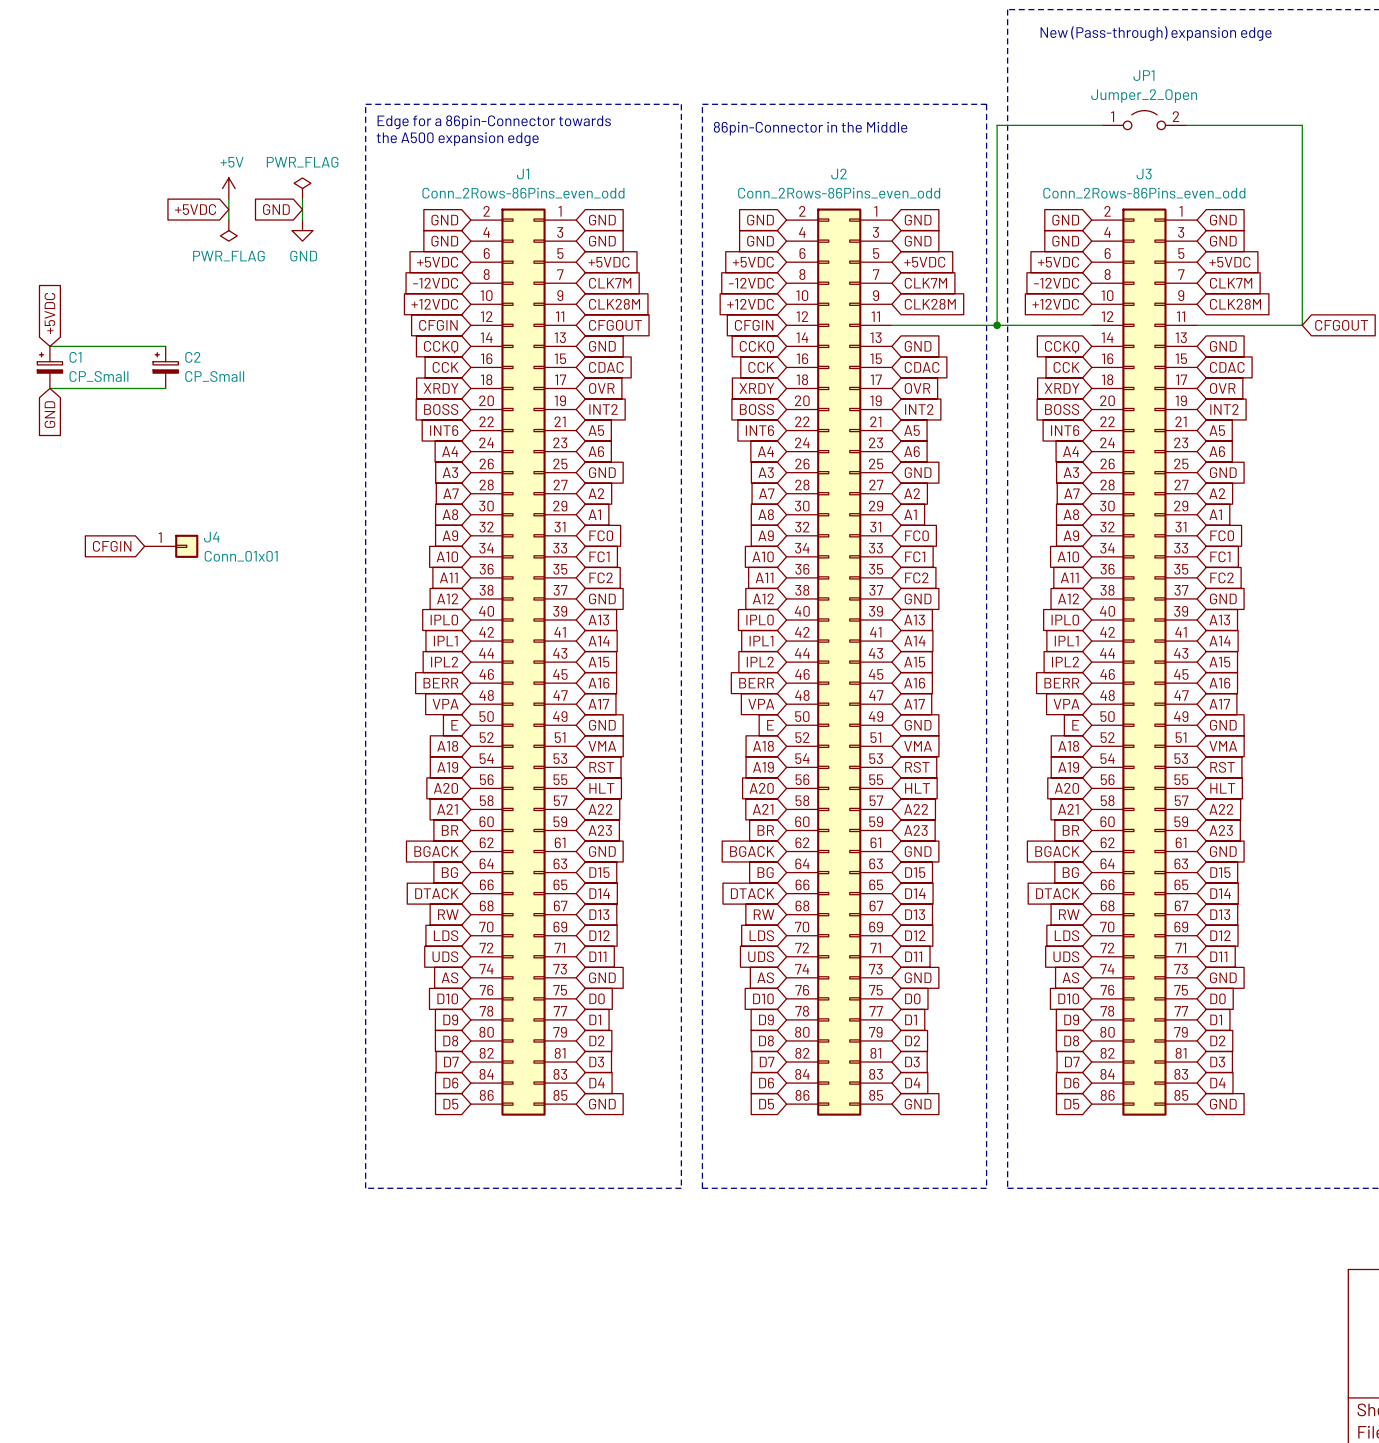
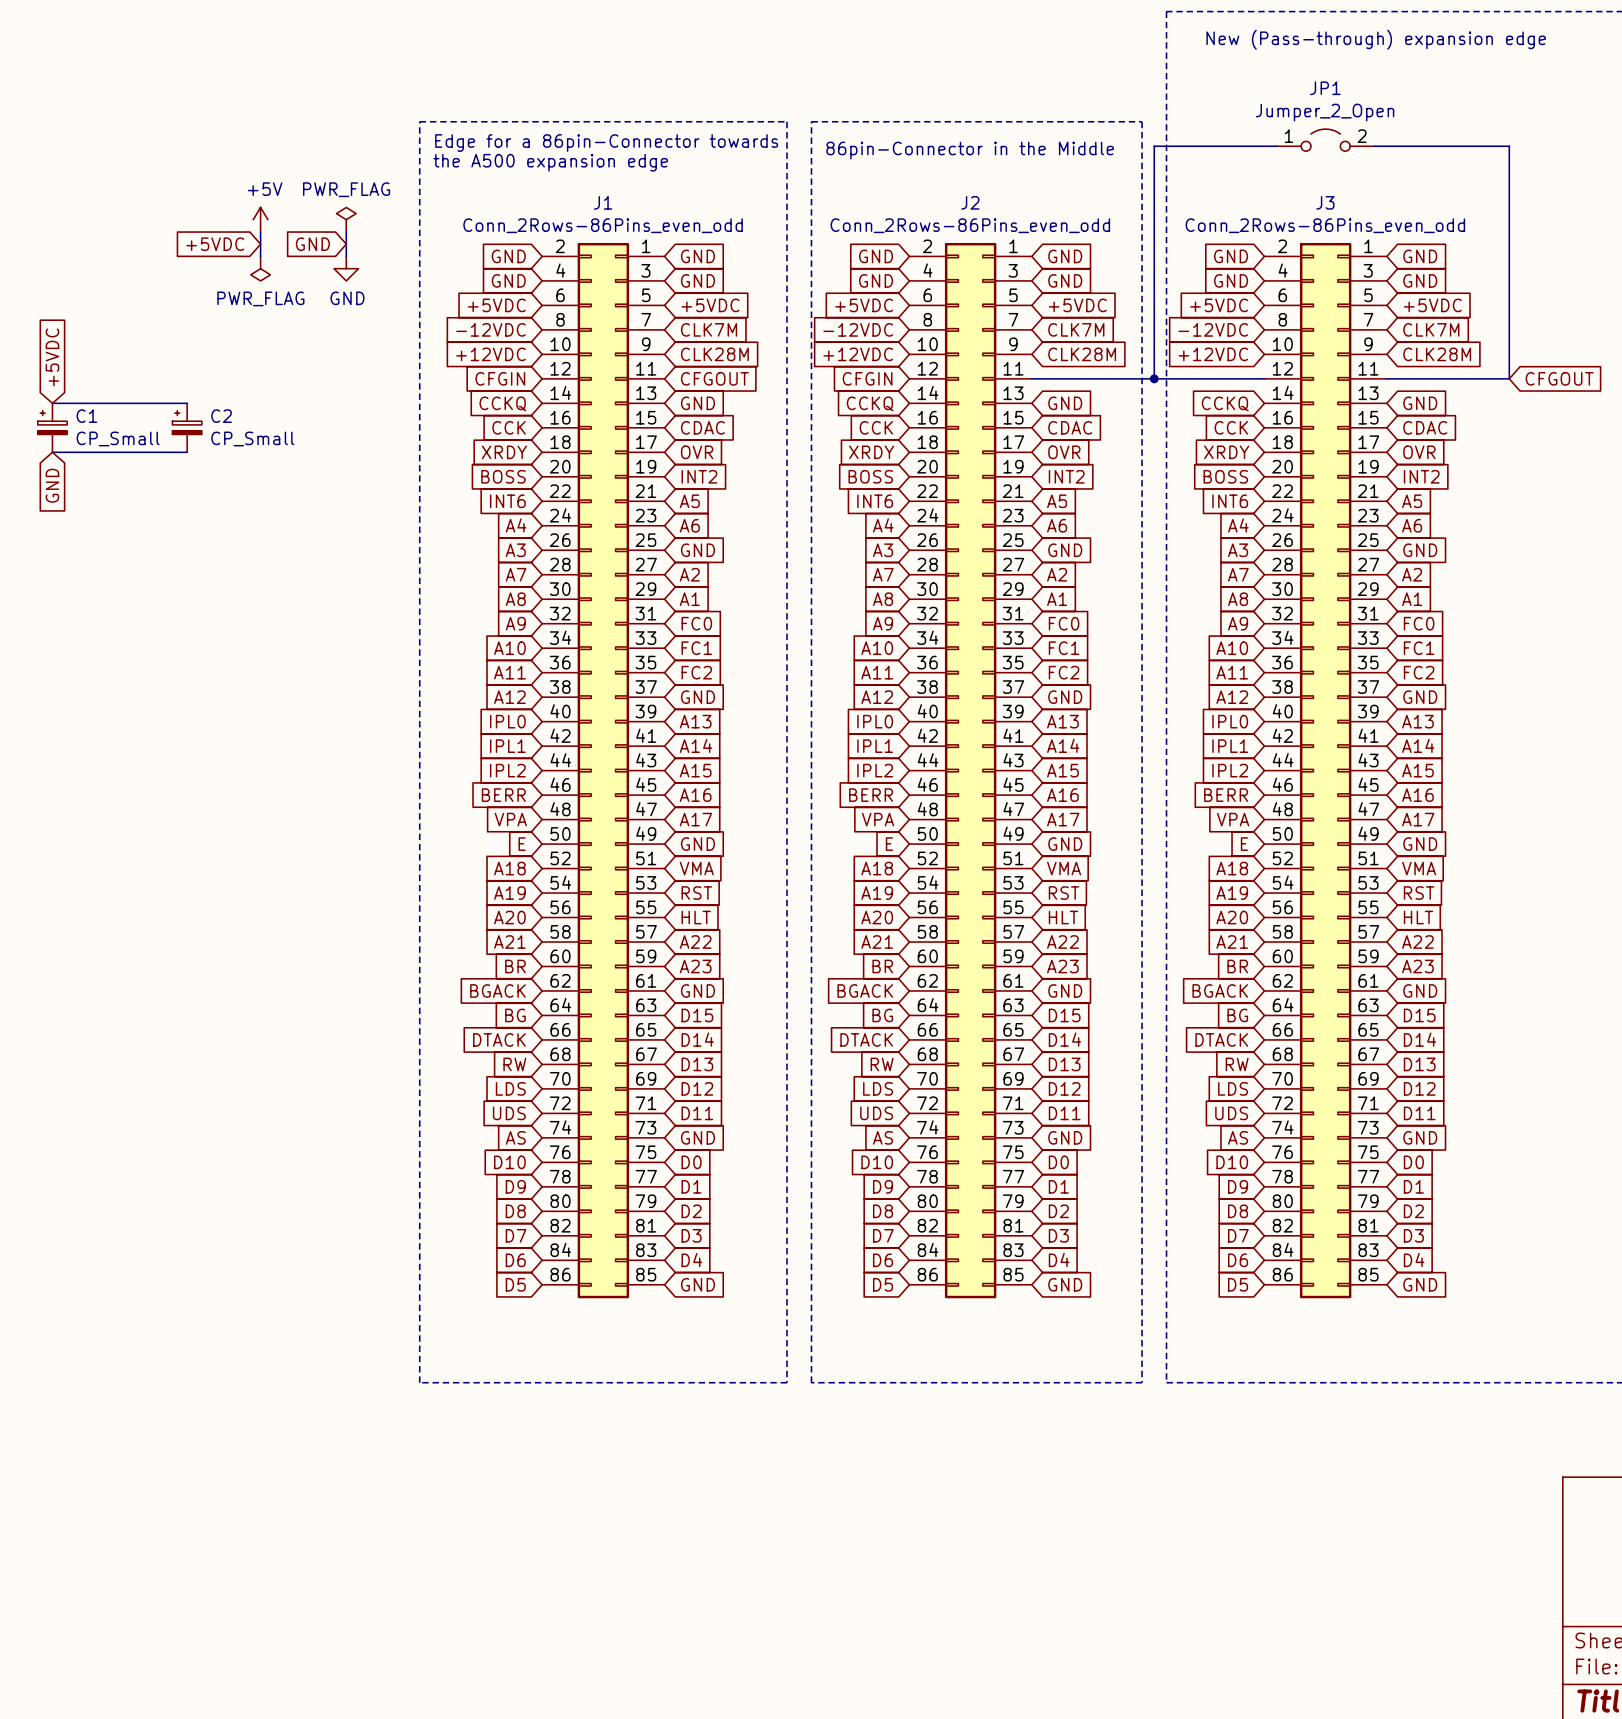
global label: CFGIN (112, 546) -> none
J4: Conn_01x01 (171, 546) -> none

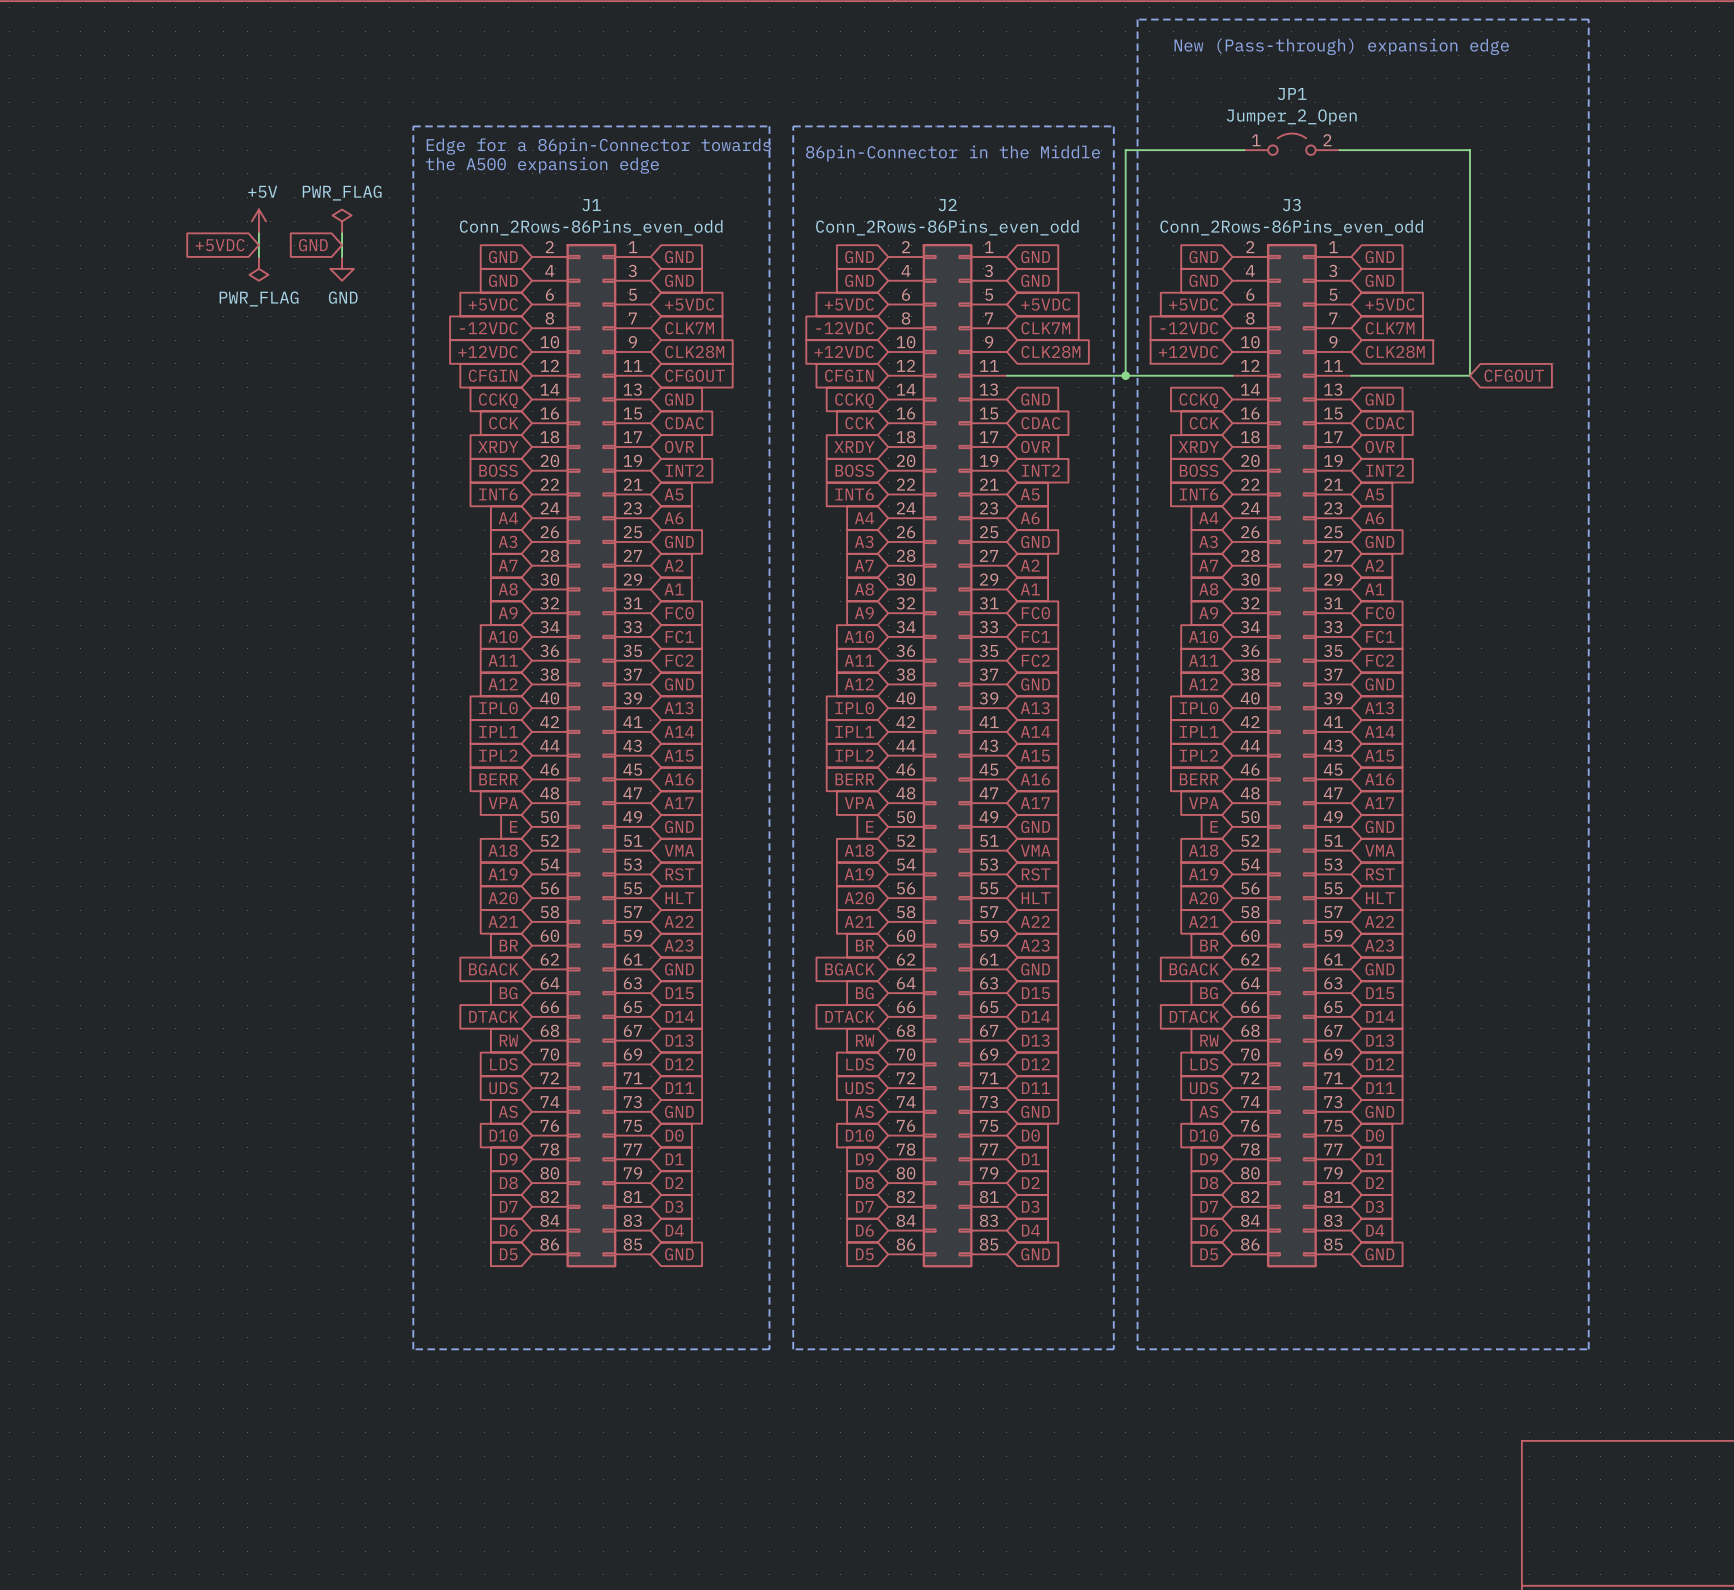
global label: +5VDC (52, 357) -> none
wire: (52, 403) (187, 403) -> none
C1: CP_Small (52, 427) -> none
C2: CP_Small (187, 427) -> none
wire: (52, 452) (187, 452) -> none
global label: GND (52, 485) -> none

